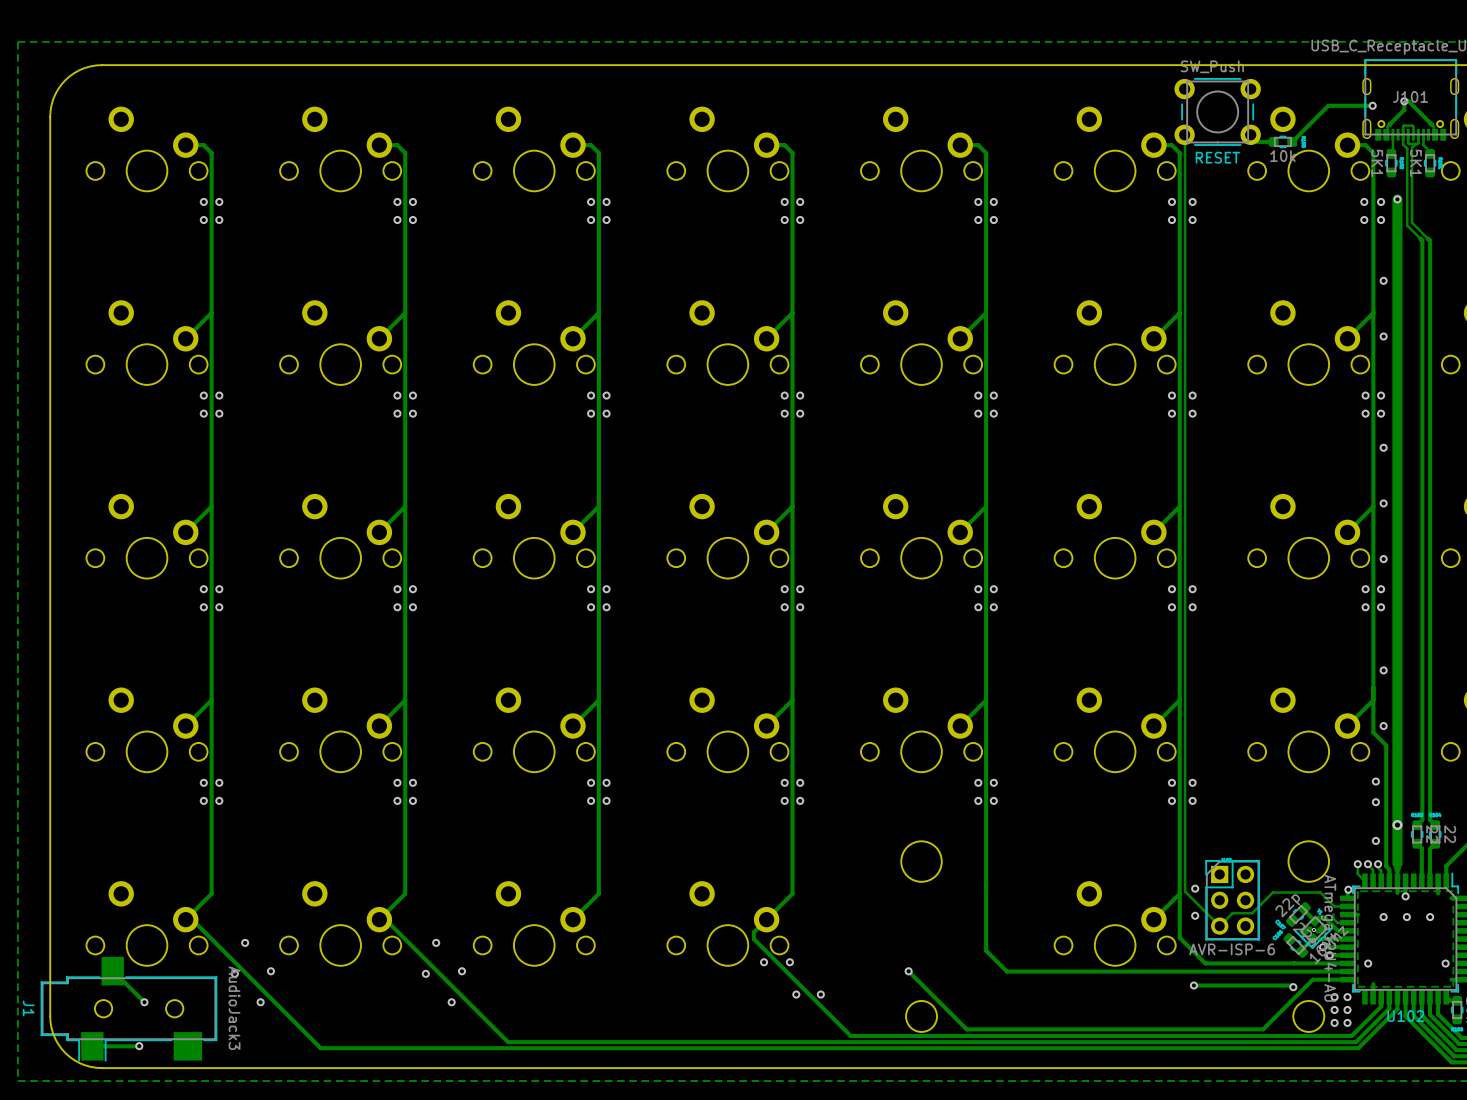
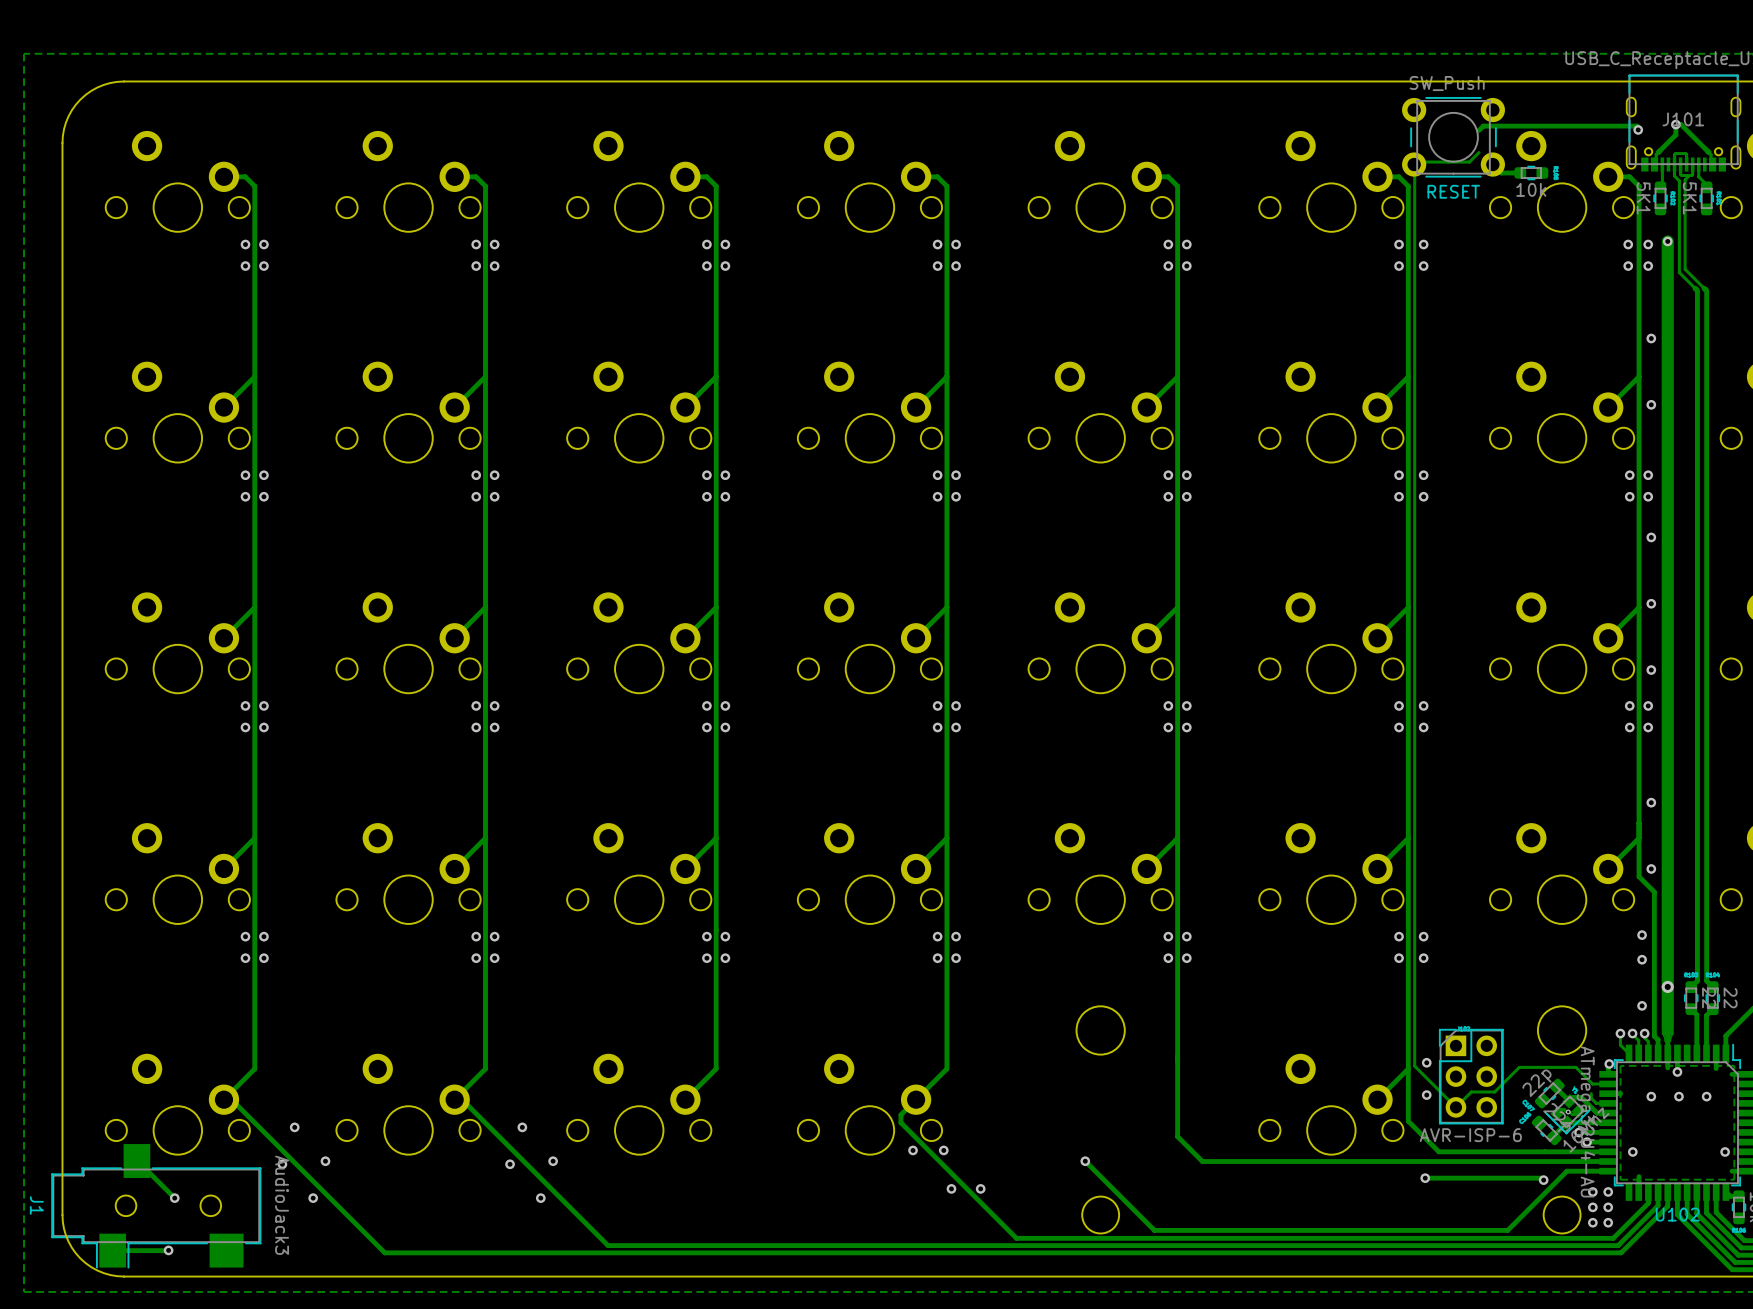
track: none -> (1637, 126) (1483, 126) (1479, 130)
track: (1372, 105) (1328, 105) (1292, 141) -> none
track: none -> (1479, 152) (1469, 162) (1418, 162) (1414, 166)

